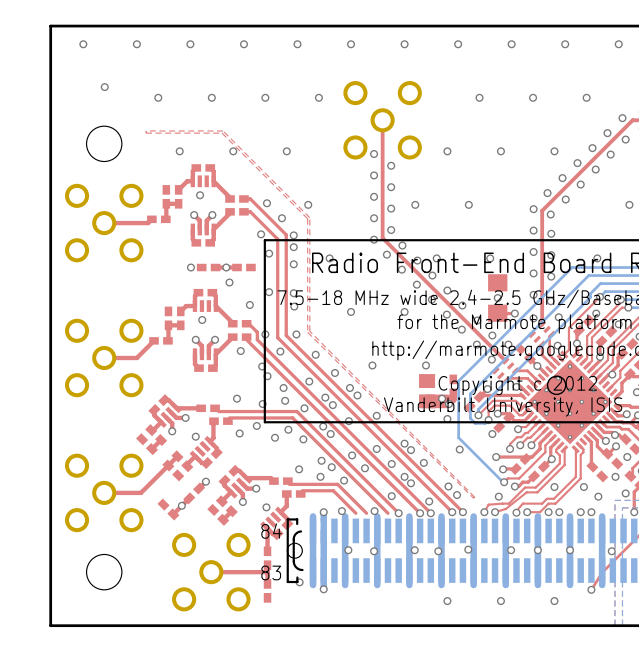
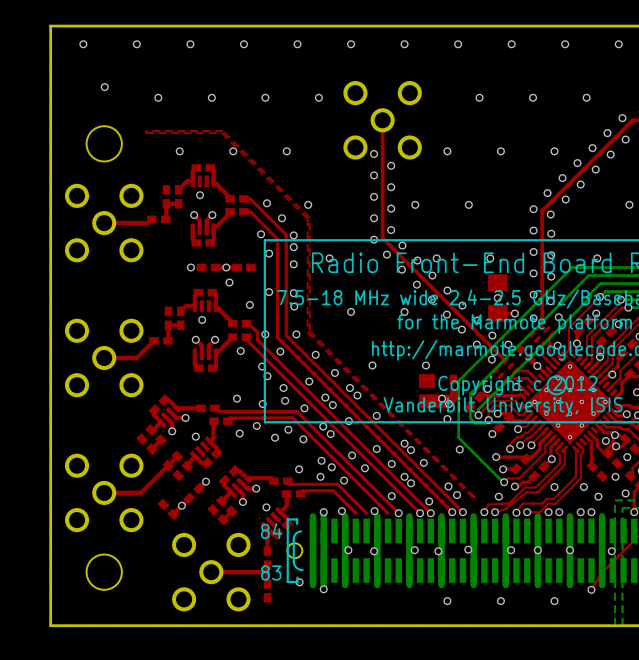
top track: (594, 430) (605, 440) -> none
top track: none -> (612, 438) (612, 443) (607, 449)
top track: none -> (625, 442) (620, 447)

